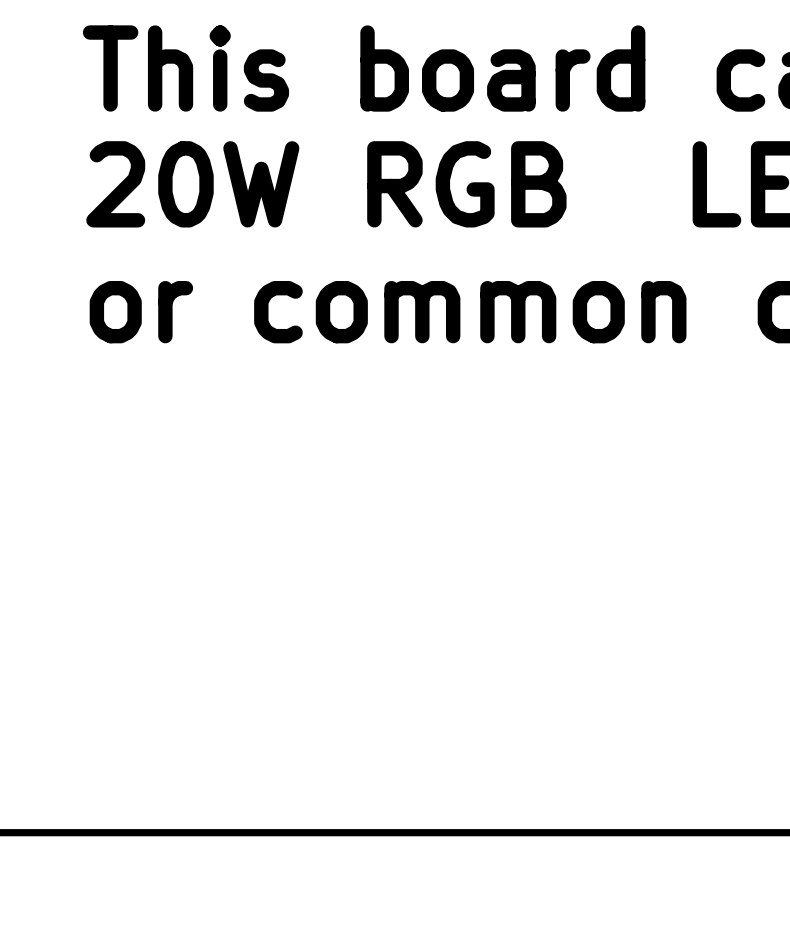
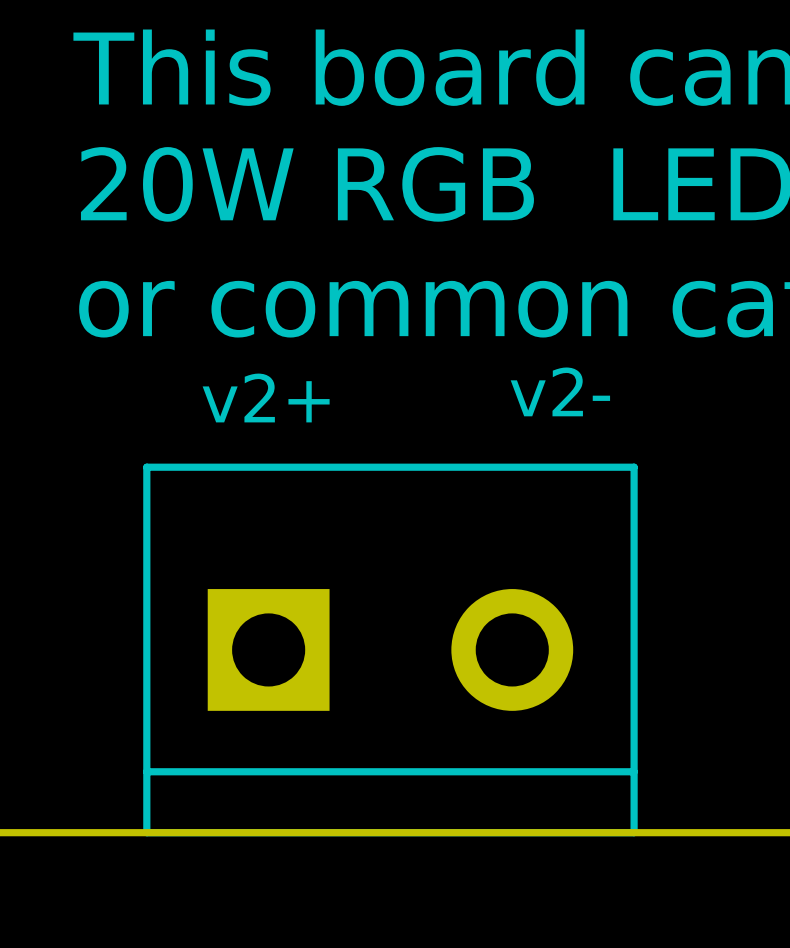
text: none -> v2- (560, 391)
text: none -> v2+ (266, 397)
part: none -> (390, 649)

